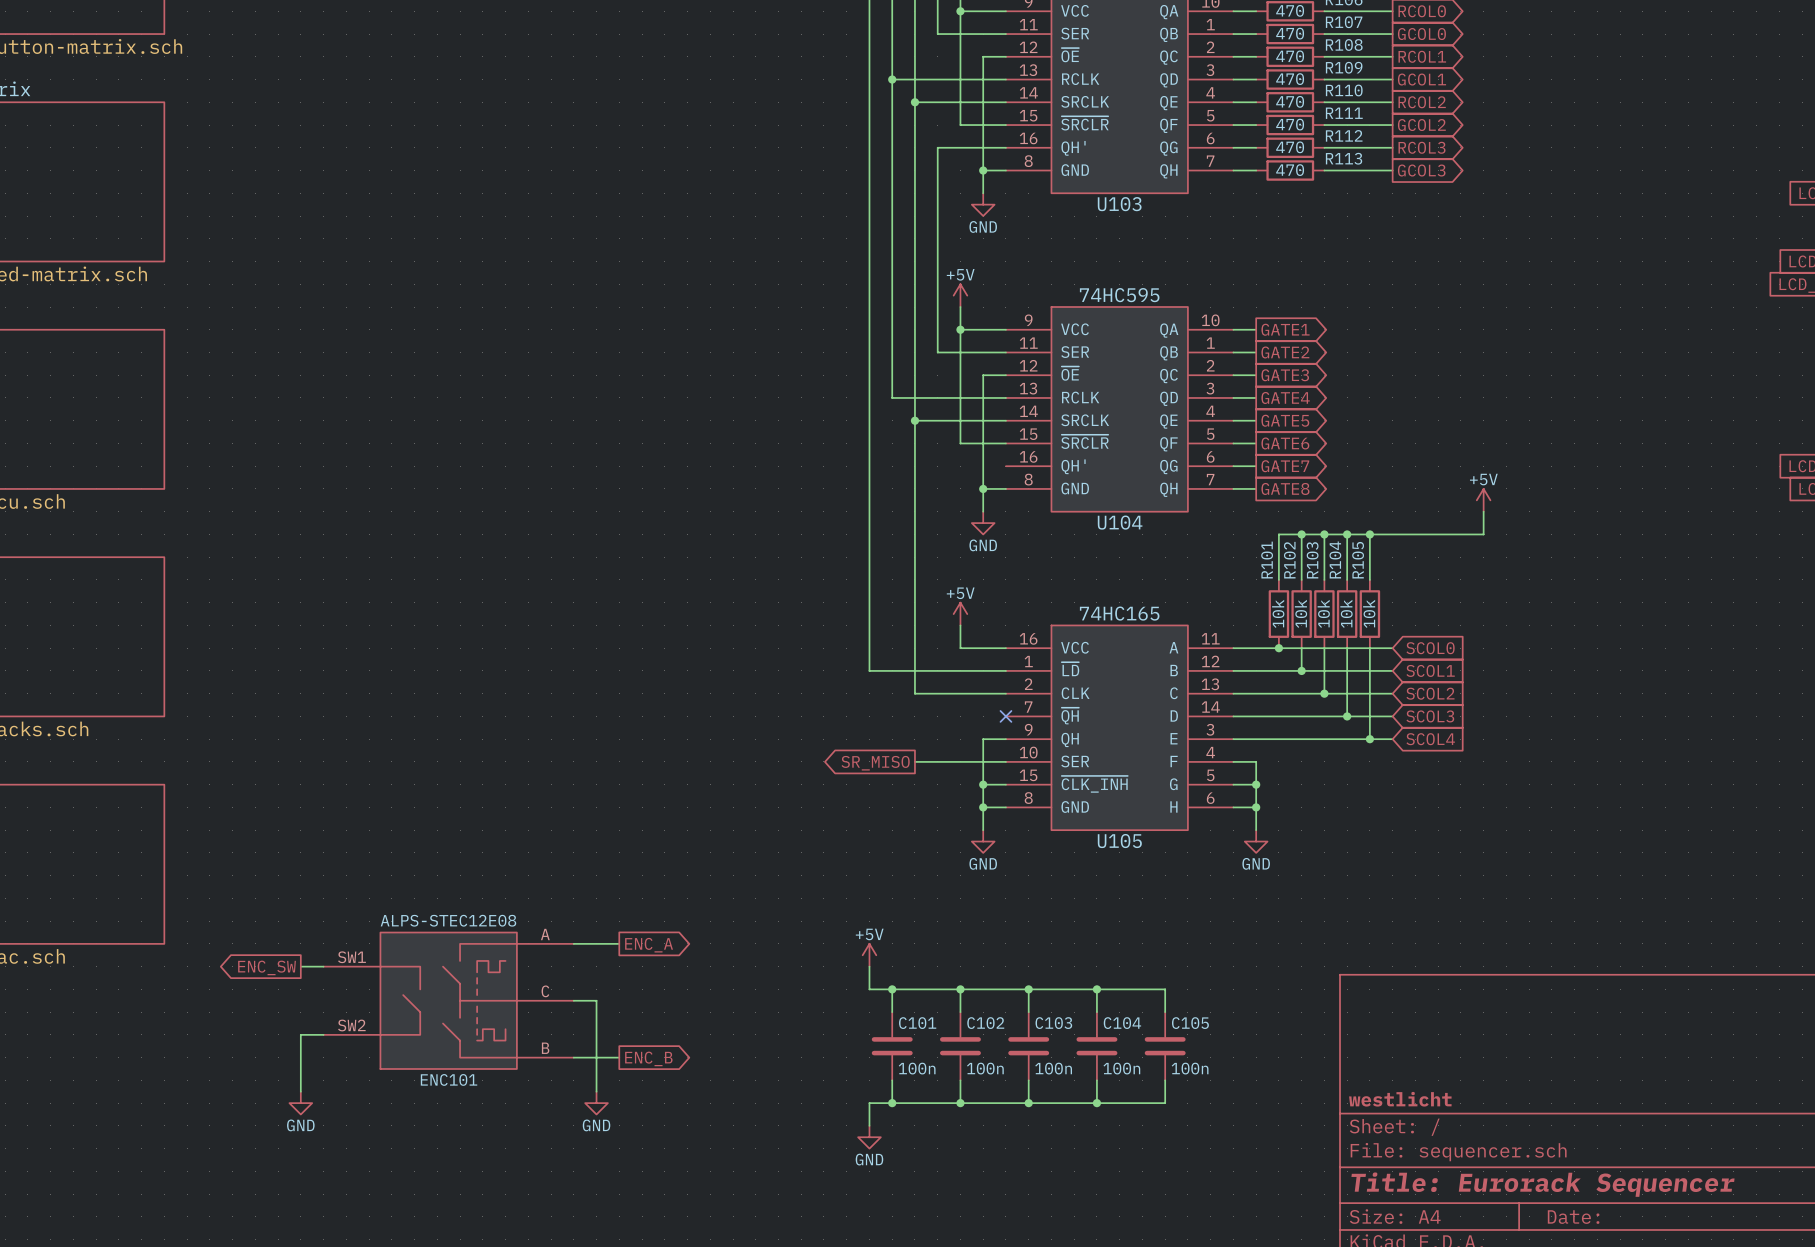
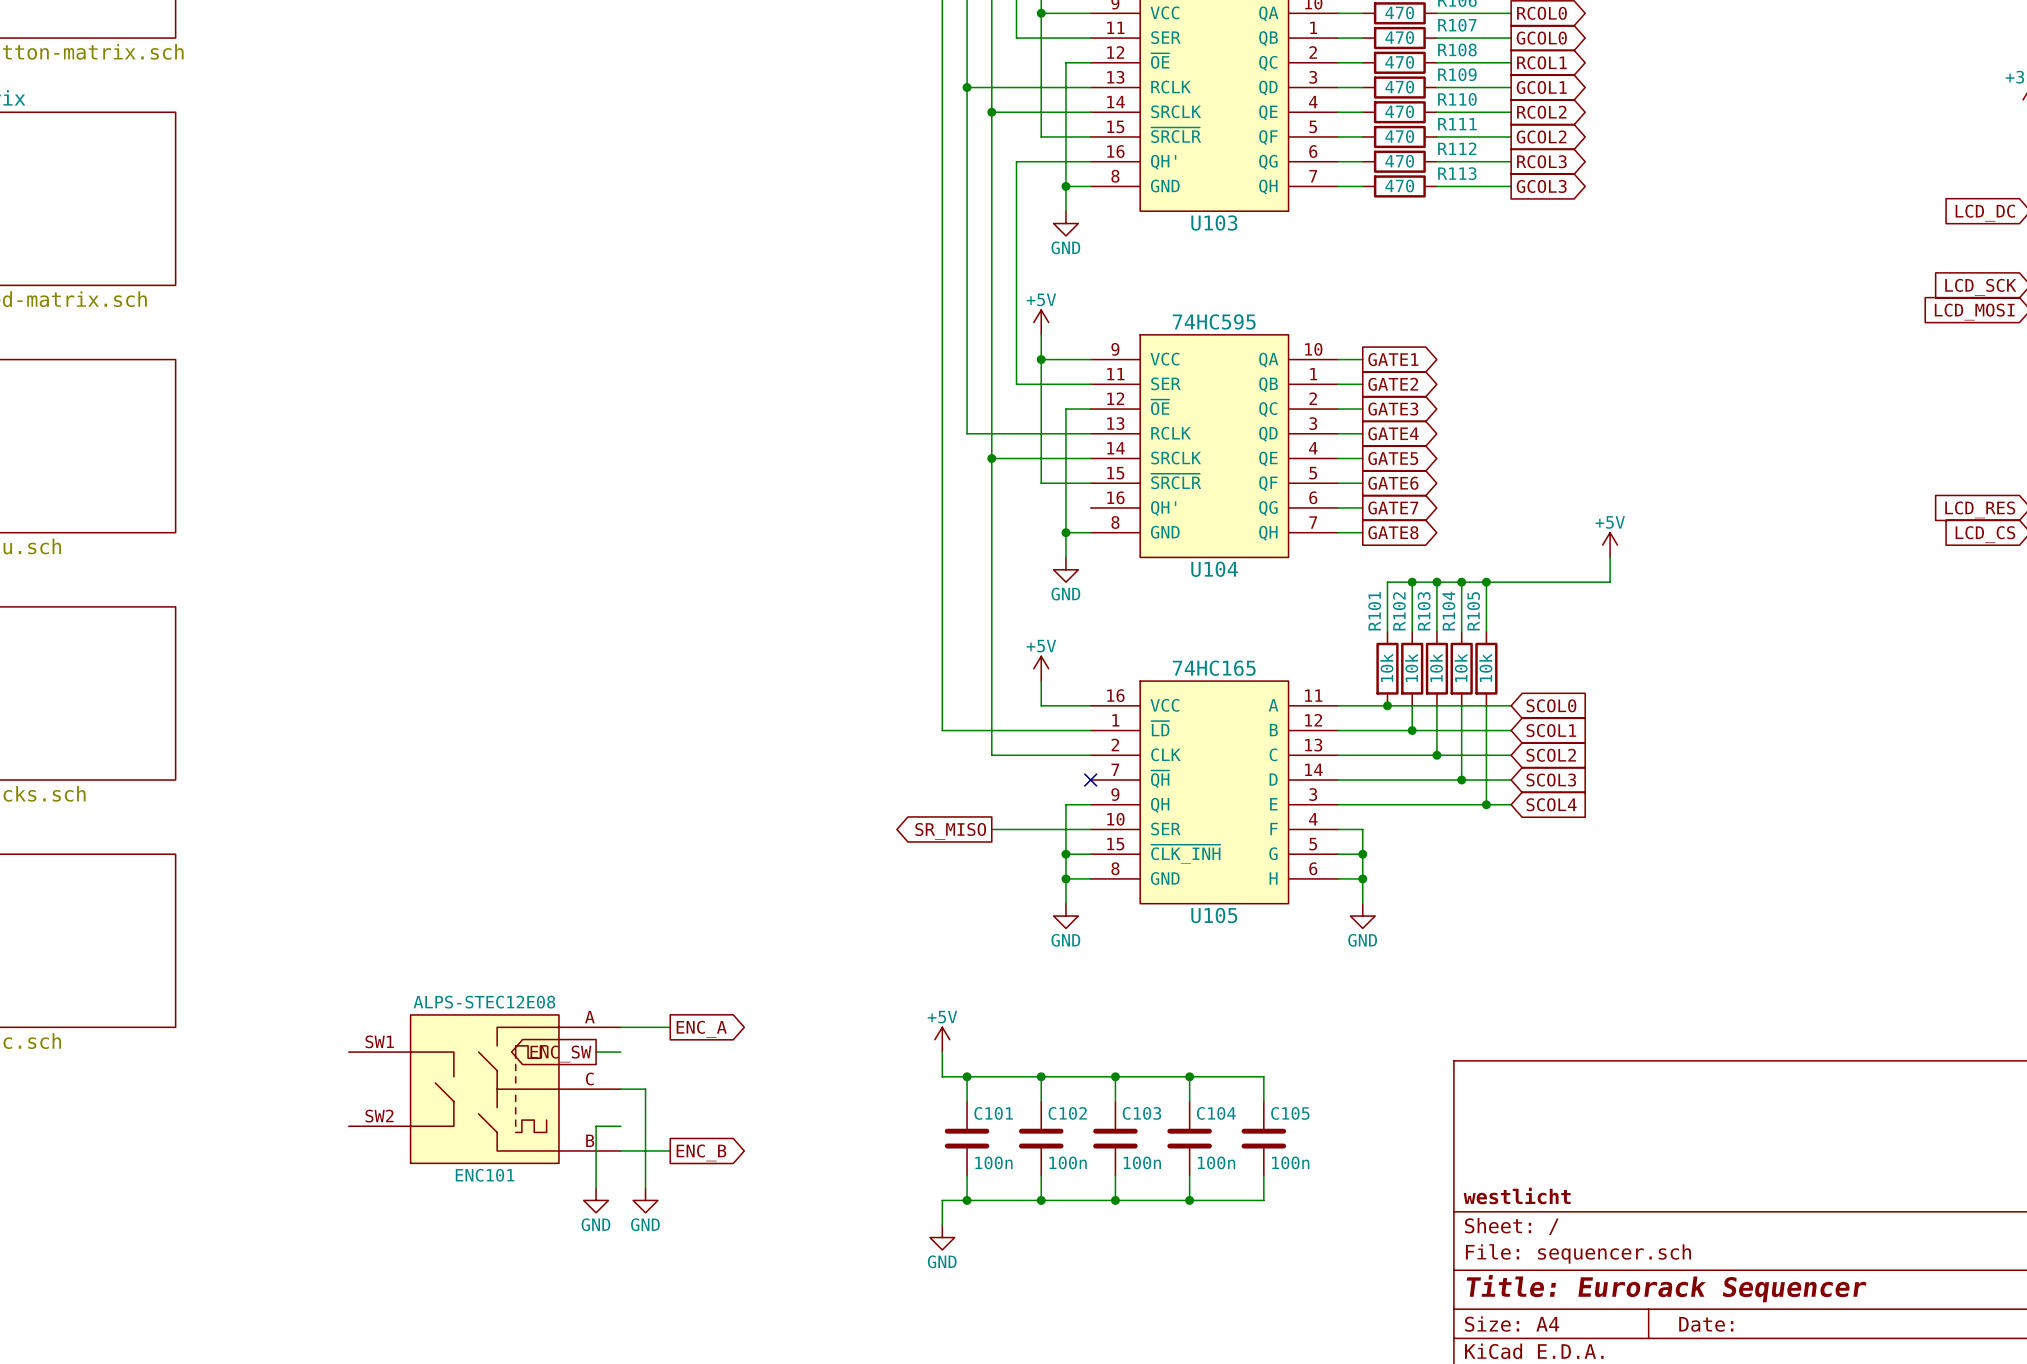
wire: (300, 966) (323, 966) -> none
wire: none -> (596, 1052) (620, 1052)
global label: ENC_SW (267, 967) -> none
global label: none -> ENC_SW (560, 1053)
wire: (323, 1034) (300, 1034) (300, 1091) -> none
wire: none -> (620, 1126) (596, 1126) (596, 1188)
power symbol: GND (300, 1103) -> none
power symbol: none -> GND (596, 1200)

